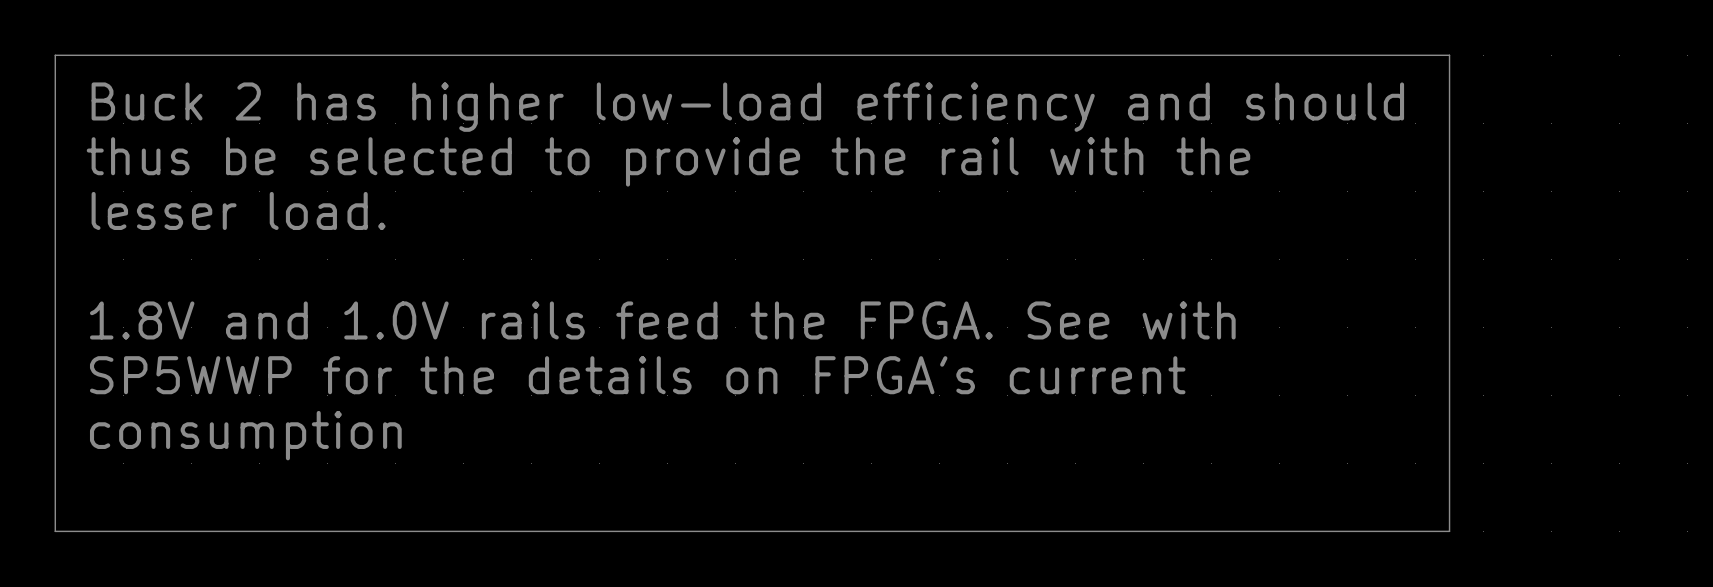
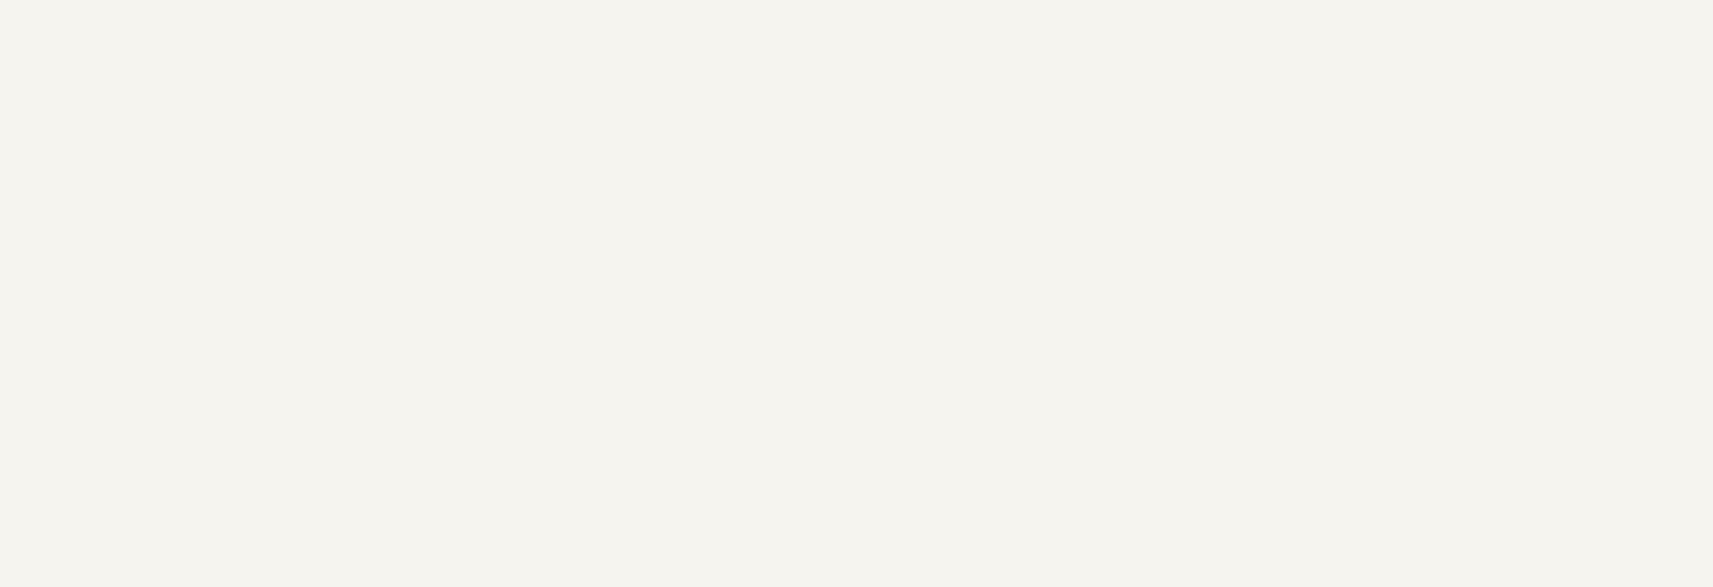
line: (55, 55) (1449, 55) (1449, 531) (55, 531) (55, 55) -> none
text: Buck 2 has higher low-load efficiency and should (747, 107) -> none
text: thus be selected to provide the rail with the (668, 161) -> none
text: lesser load. (238, 210) -> none
text: 1.8V and 1.0V rails feed the FPGA. See with (662, 320) -> none
text: SP5WWP for the details on FPGA's current (637, 375) -> none
text: consumption (245, 435) -> none

